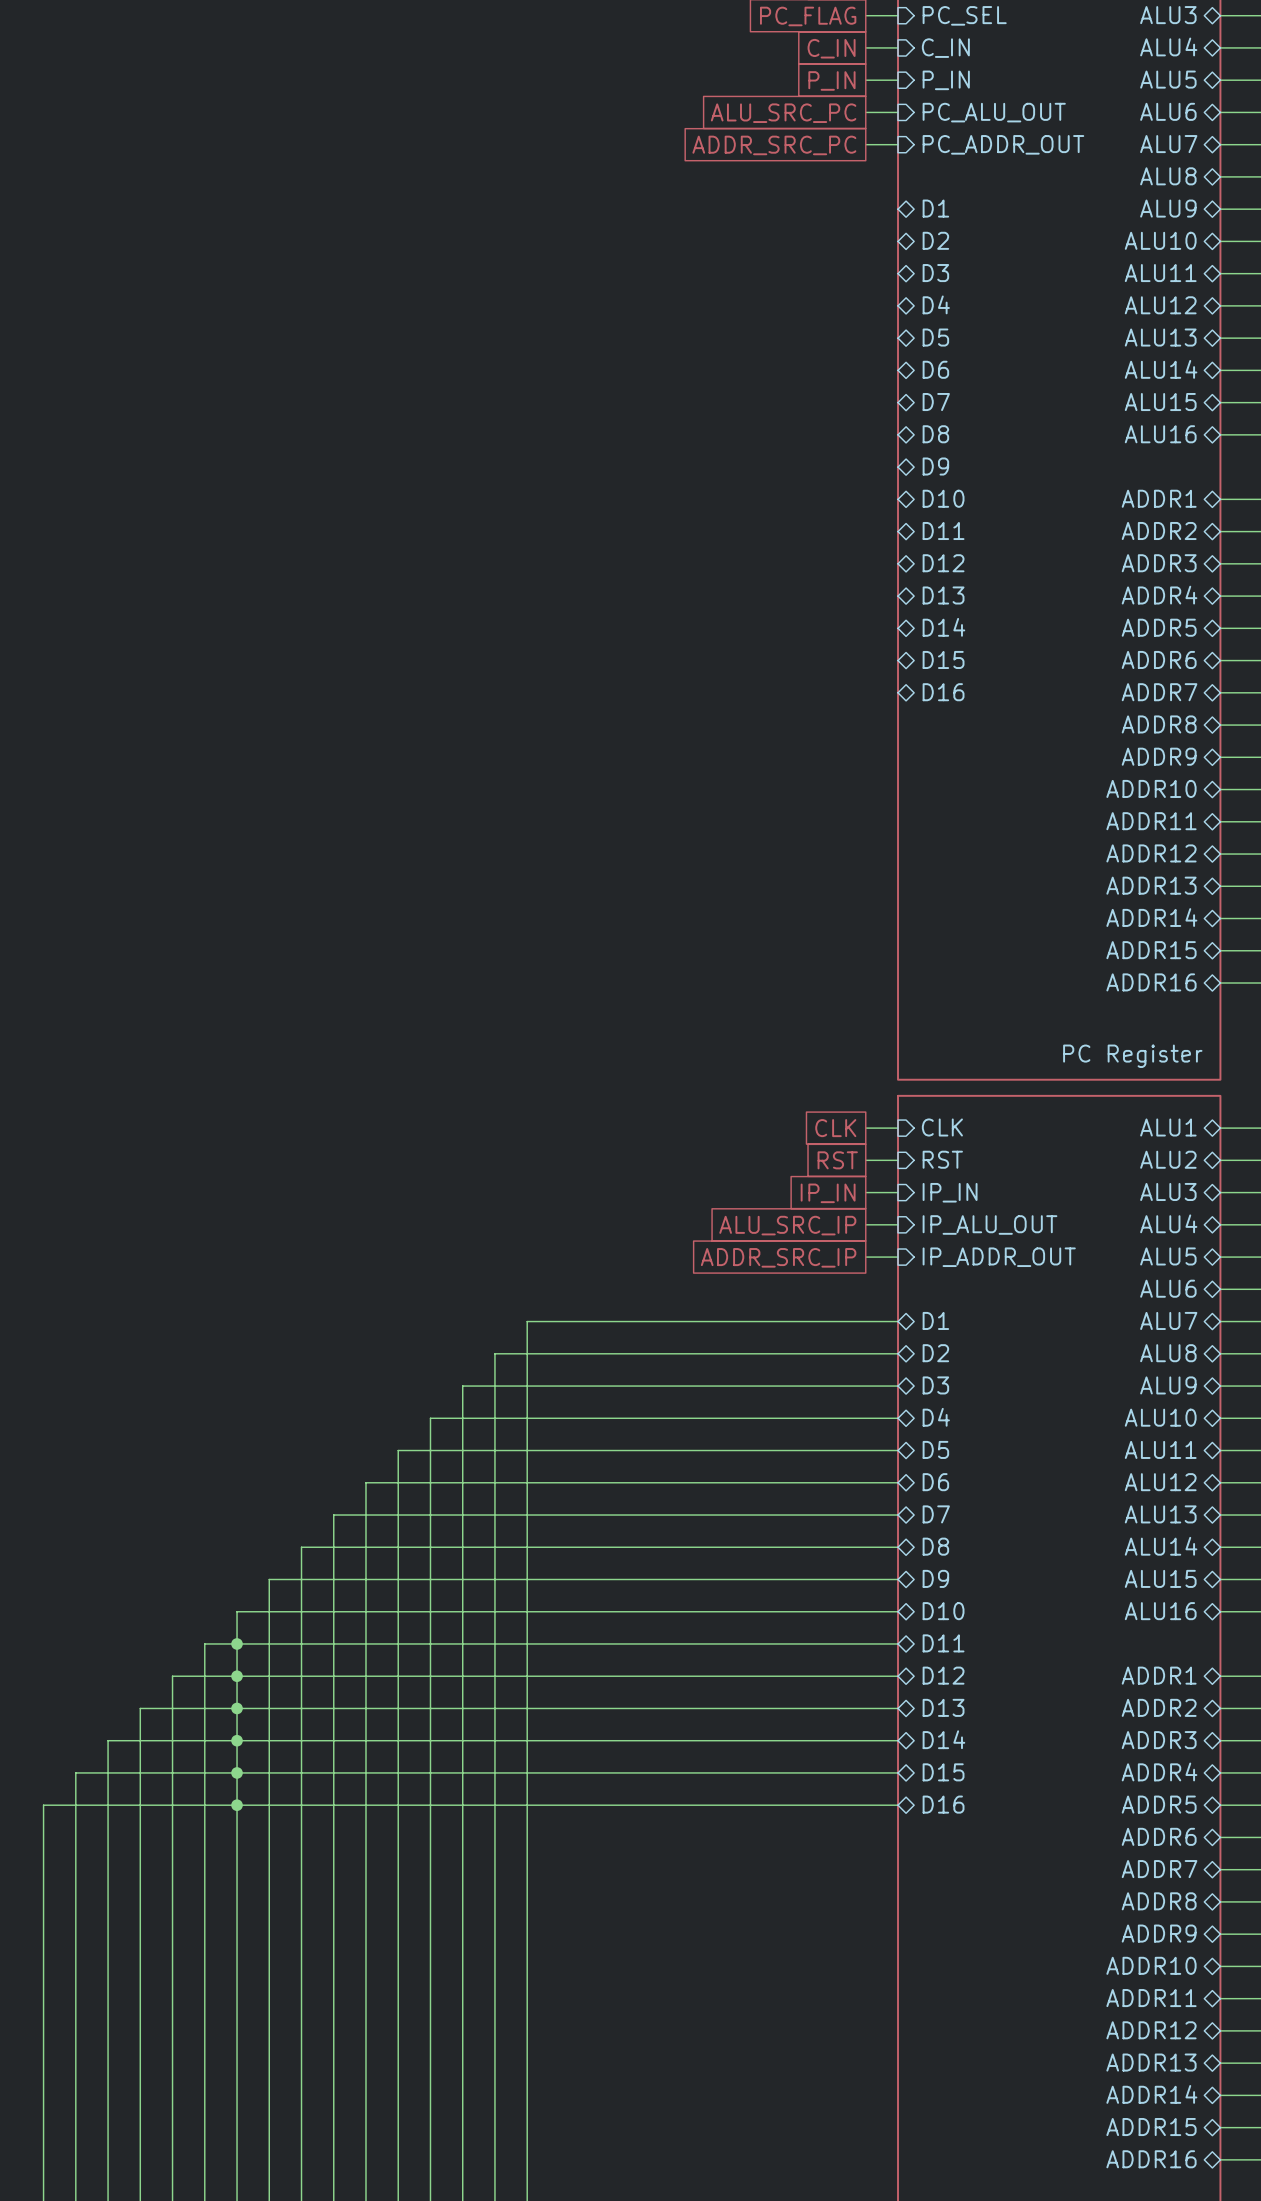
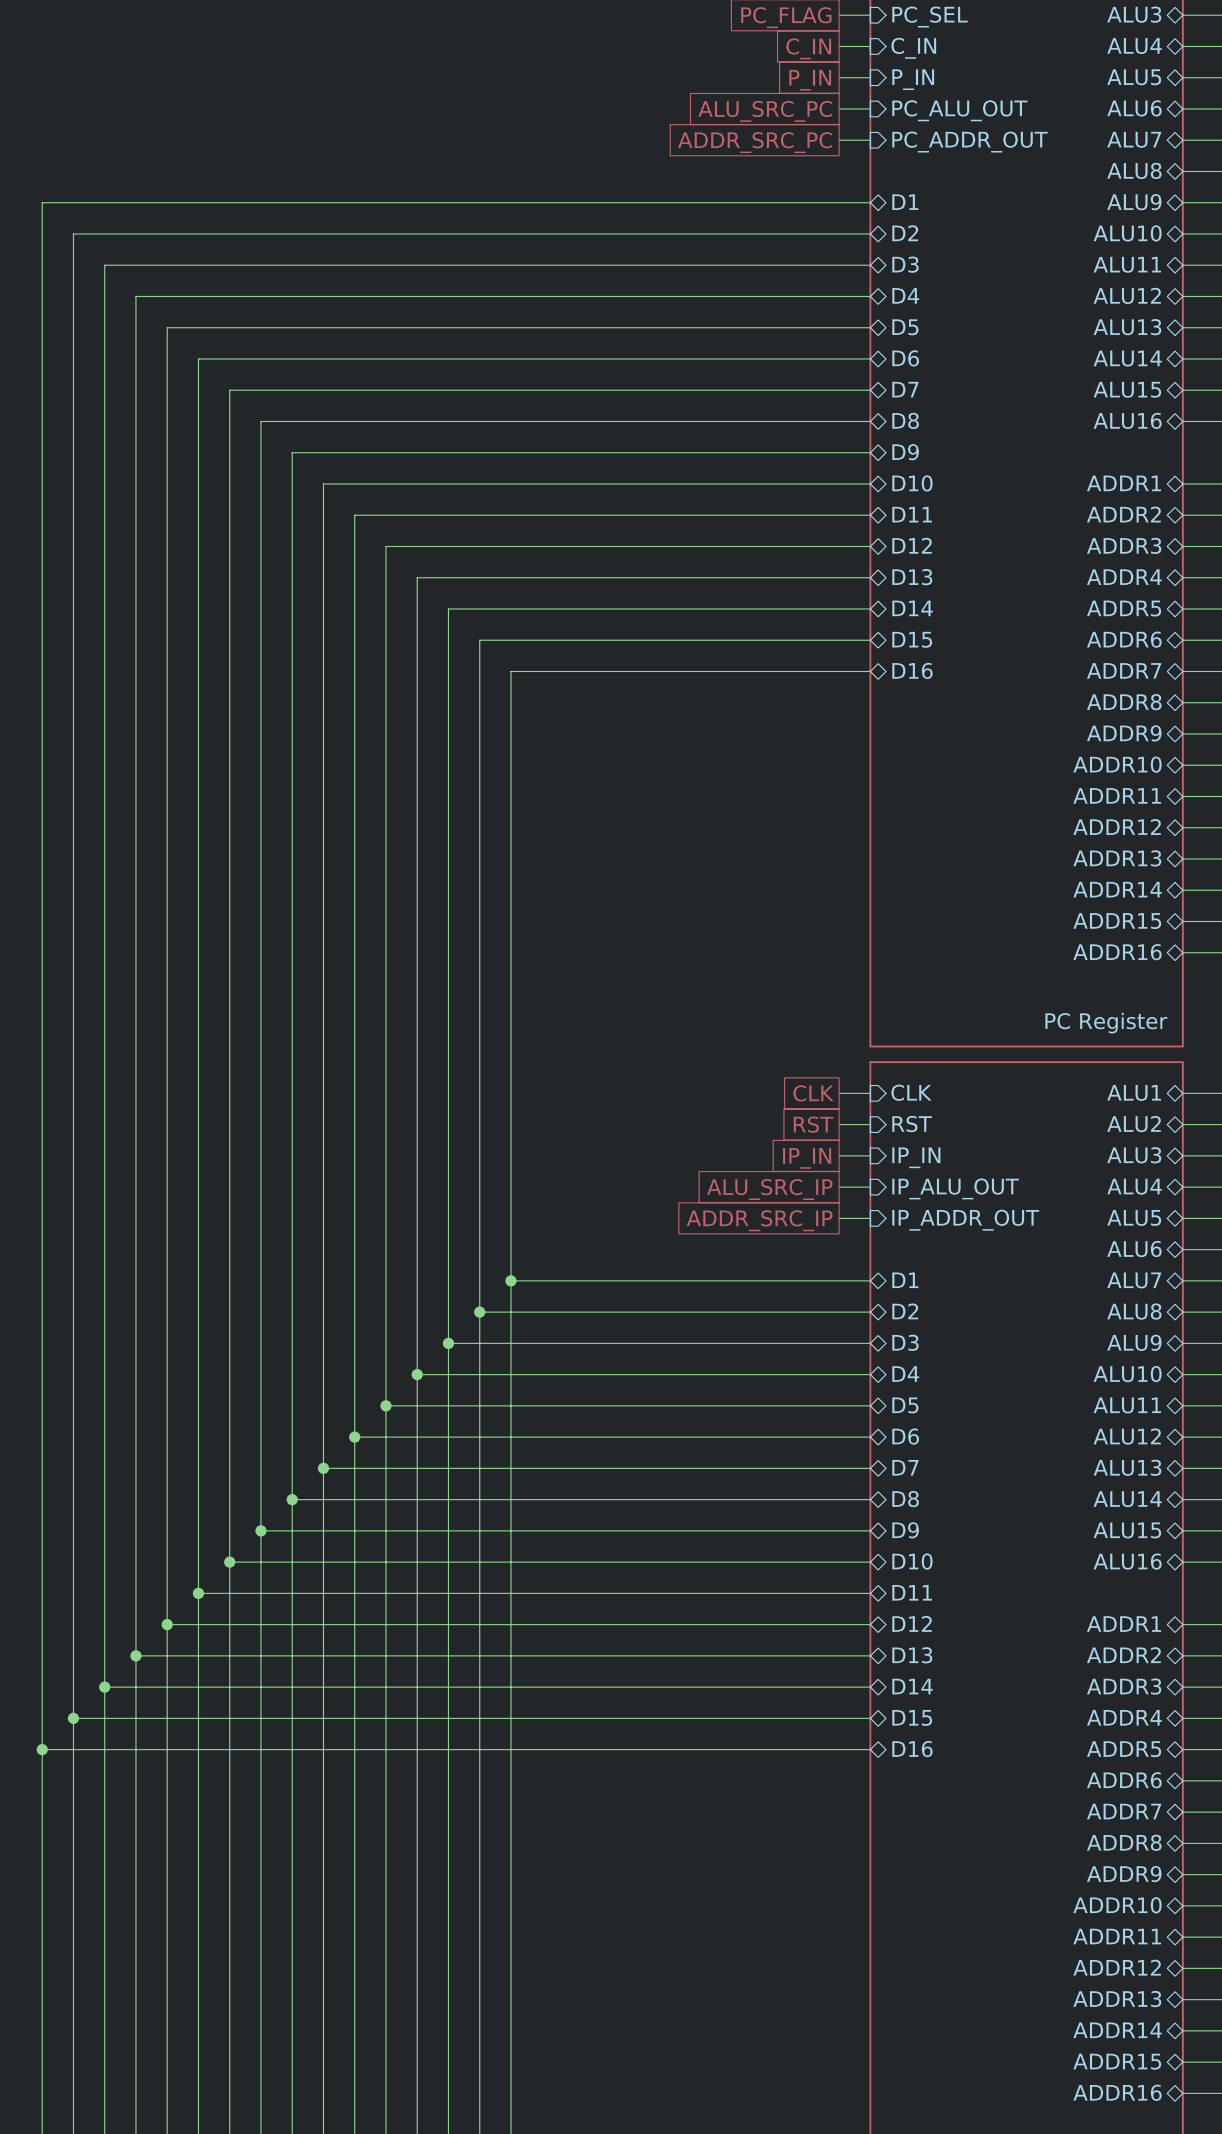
wire: none -> (870, 202) (42, 202) (42, 1749)
wire: none -> (870, 233) (73, 233) (73, 1718)
wire: none -> (870, 265) (104, 265) (104, 1687)
wire: none -> (870, 296) (135, 296) (135, 1655)
wire: none -> (870, 327) (167, 327) (167, 1624)
wire: none -> (870, 358) (198, 358) (198, 1593)
wire: none -> (870, 390) (229, 390) (229, 1562)
wire: none -> (870, 421) (260, 421) (260, 1530)
wire: none -> (870, 452) (292, 452) (292, 1499)
wire: none -> (870, 483) (323, 483) (323, 1468)
wire: none -> (870, 515) (354, 515) (354, 1437)
wire: none -> (870, 546) (385, 546) (385, 1405)
wire: none -> (870, 577) (417, 577) (417, 1374)
wire: none -> (870, 608) (448, 608) (448, 1343)
wire: none -> (870, 640) (479, 640) (479, 1312)
wire: none -> (870, 671) (510, 671) (510, 1280)
junction: none -> (510, 1280)
junction: none -> (479, 1312)
junction: none -> (448, 1343)
junction: none -> (417, 1374)
junction: none -> (385, 1405)
junction: none -> (354, 1437)
junction: none -> (323, 1468)
junction: none -> (292, 1499)
junction: none -> (260, 1530)
junction: none -> (229, 1562)
junction: none -> (198, 1593)
junction: (237, 1643) -> none
junction: none -> (167, 1624)
junction: (237, 1676) -> none
junction: none -> (135, 1655)
junction: (237, 1708) -> none
junction: none -> (104, 1687)
junction: (237, 1740) -> none
junction: none -> (73, 1718)
junction: (237, 1772) -> none
junction: none -> (42, 1749)
junction: (237, 1805) -> none

